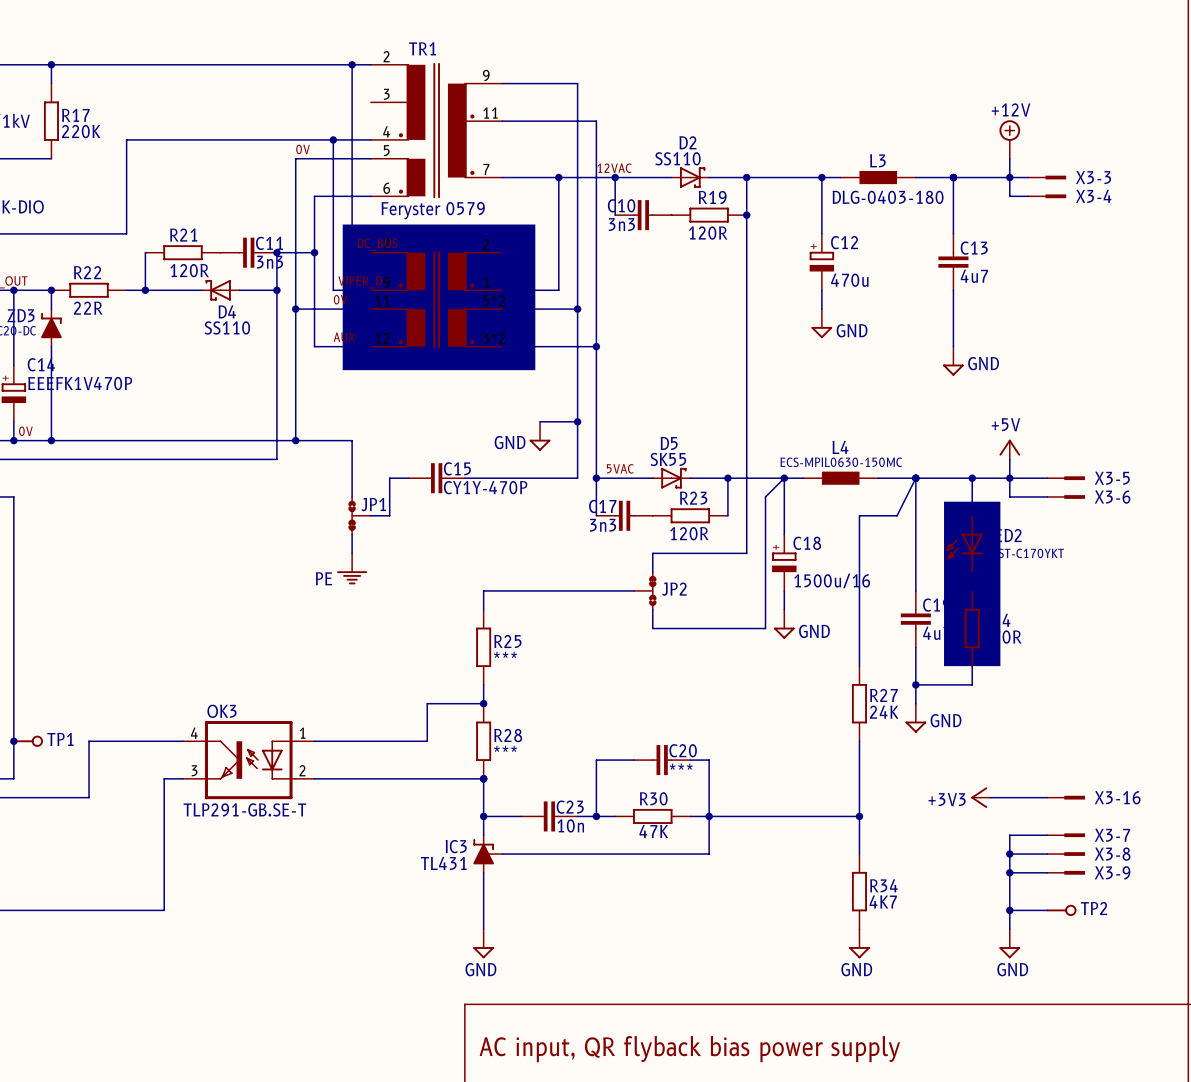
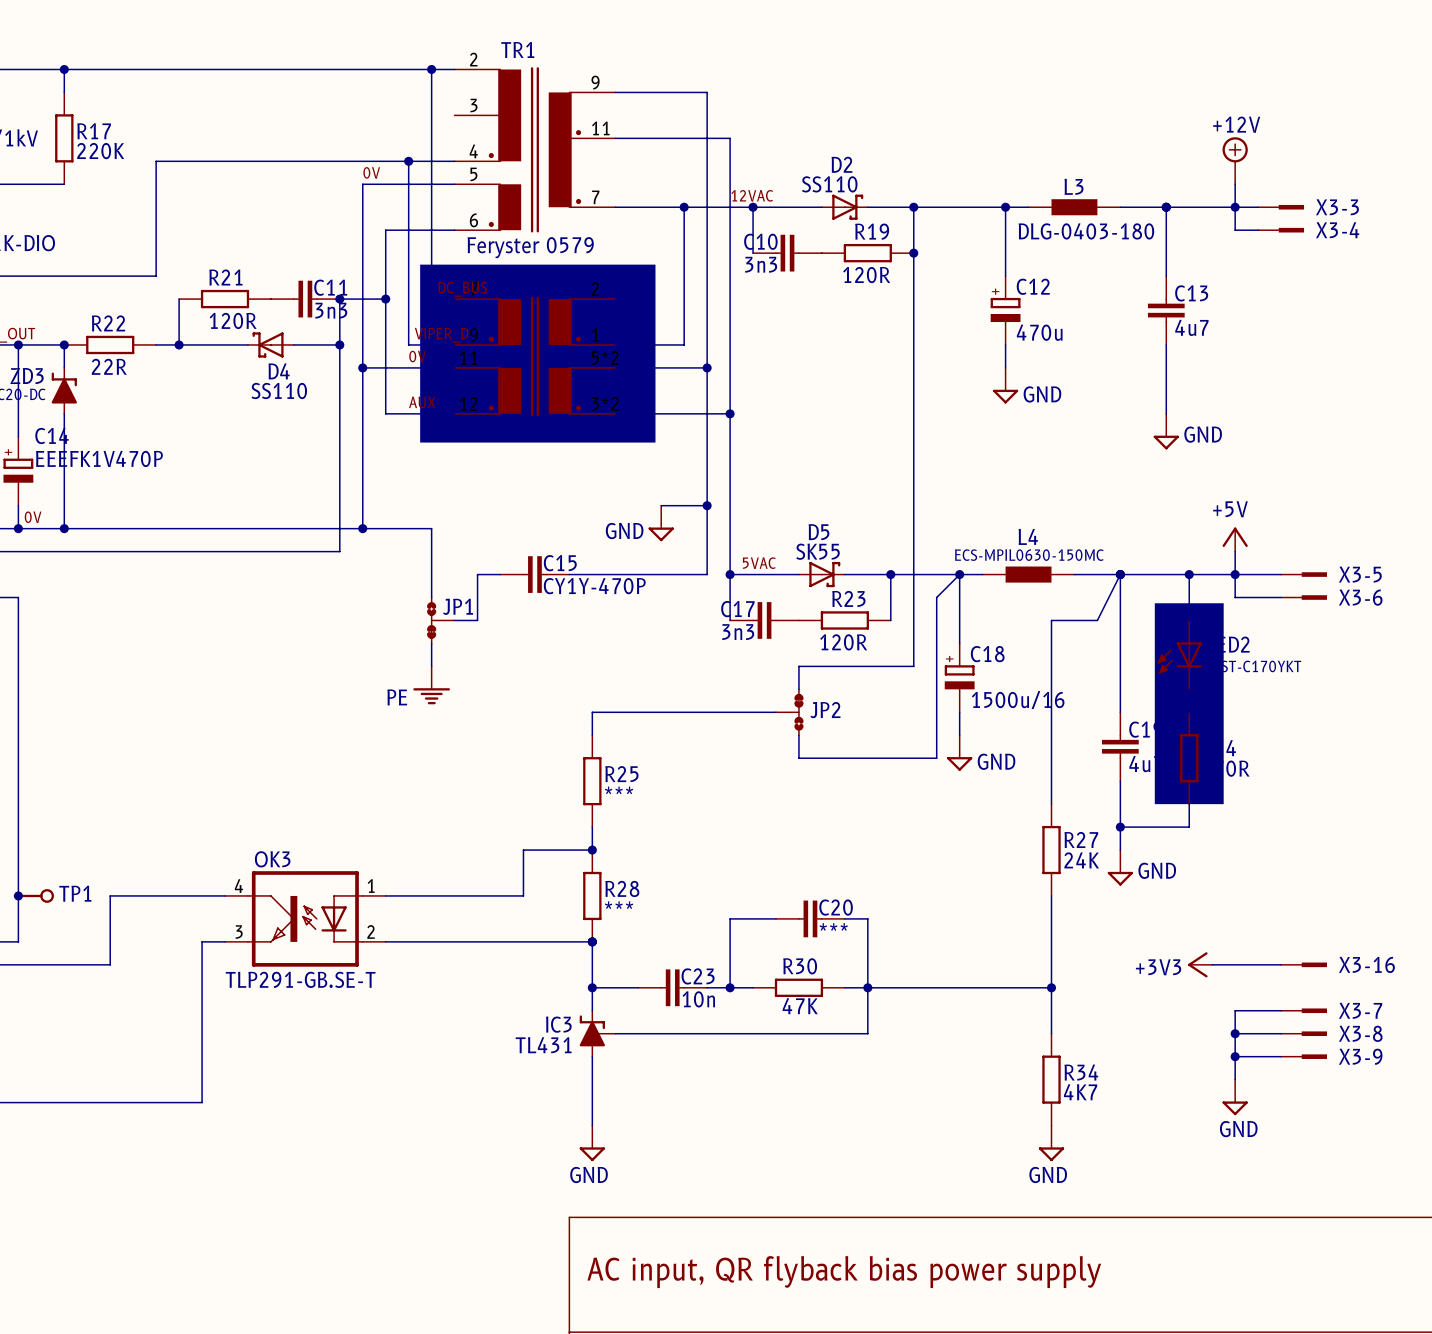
wire: (1009, 910) (1047, 910) -> none
junction: (1009, 910) -> none
TP2: (1061, 910) -> none
power symbol position: GND (1009, 943) -> GND (1235, 1097)

